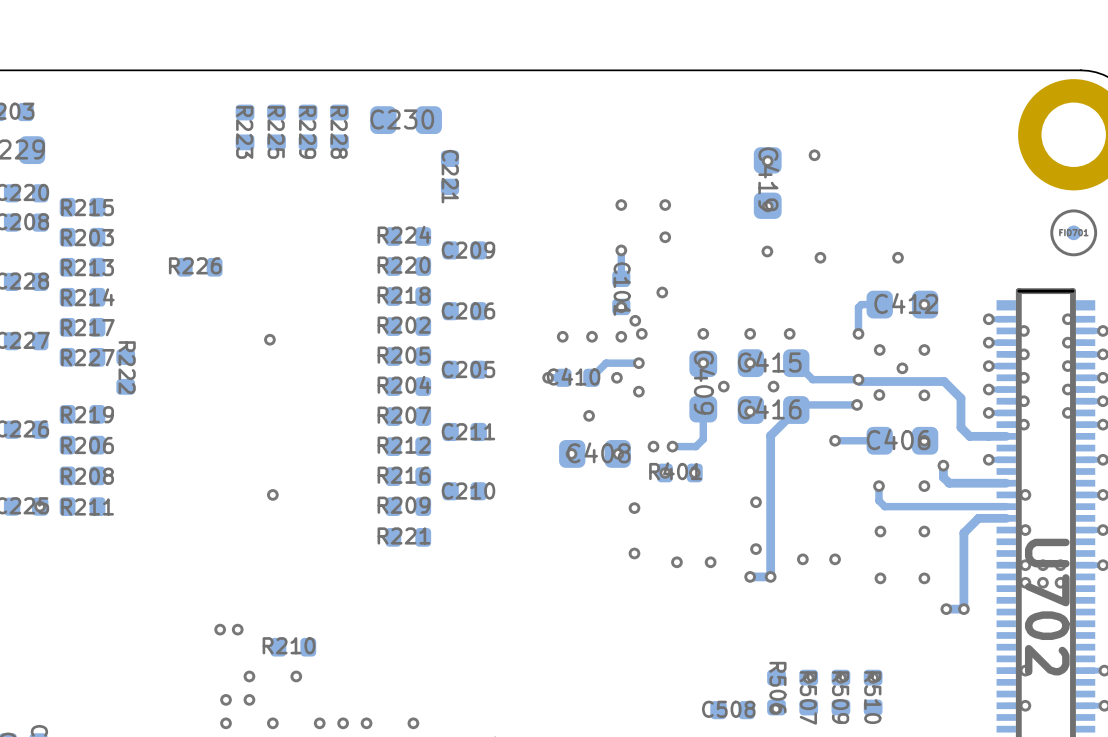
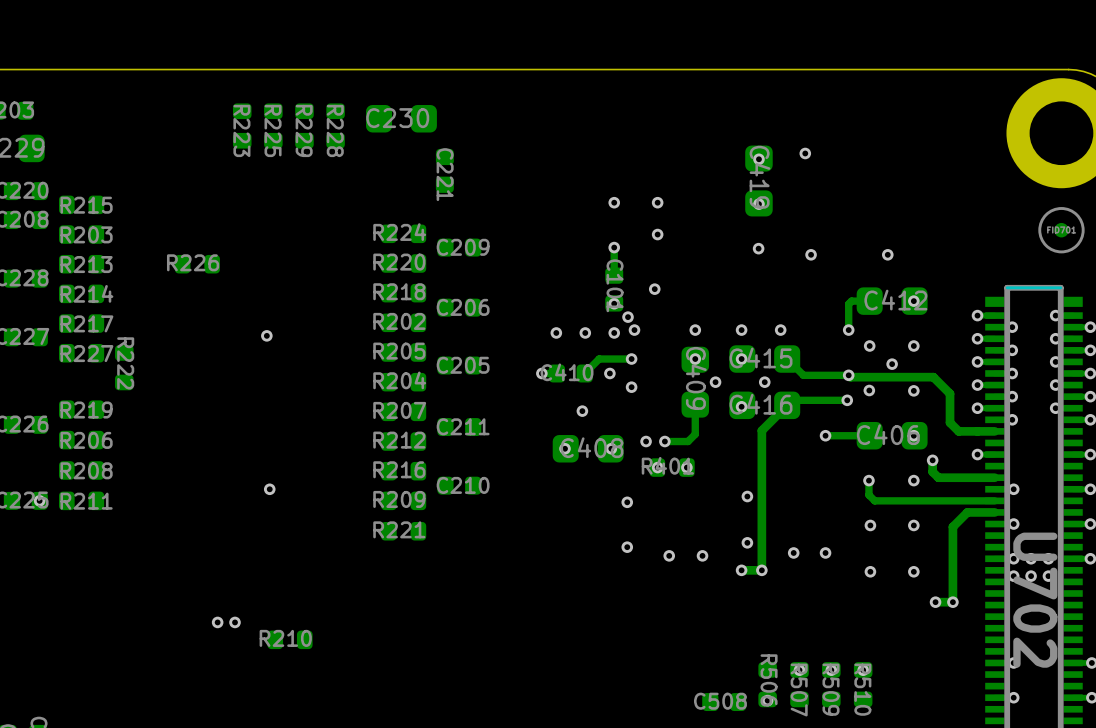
via: (249, 676) -> none
via: (296, 676) -> none
via: (226, 699) -> none
via: (249, 699) -> none
via: (226, 723) -> none
via: (272, 723) -> none
via: (319, 723) -> none
via: (343, 723) -> none
via: (366, 723) -> none
via: (413, 723) -> none

